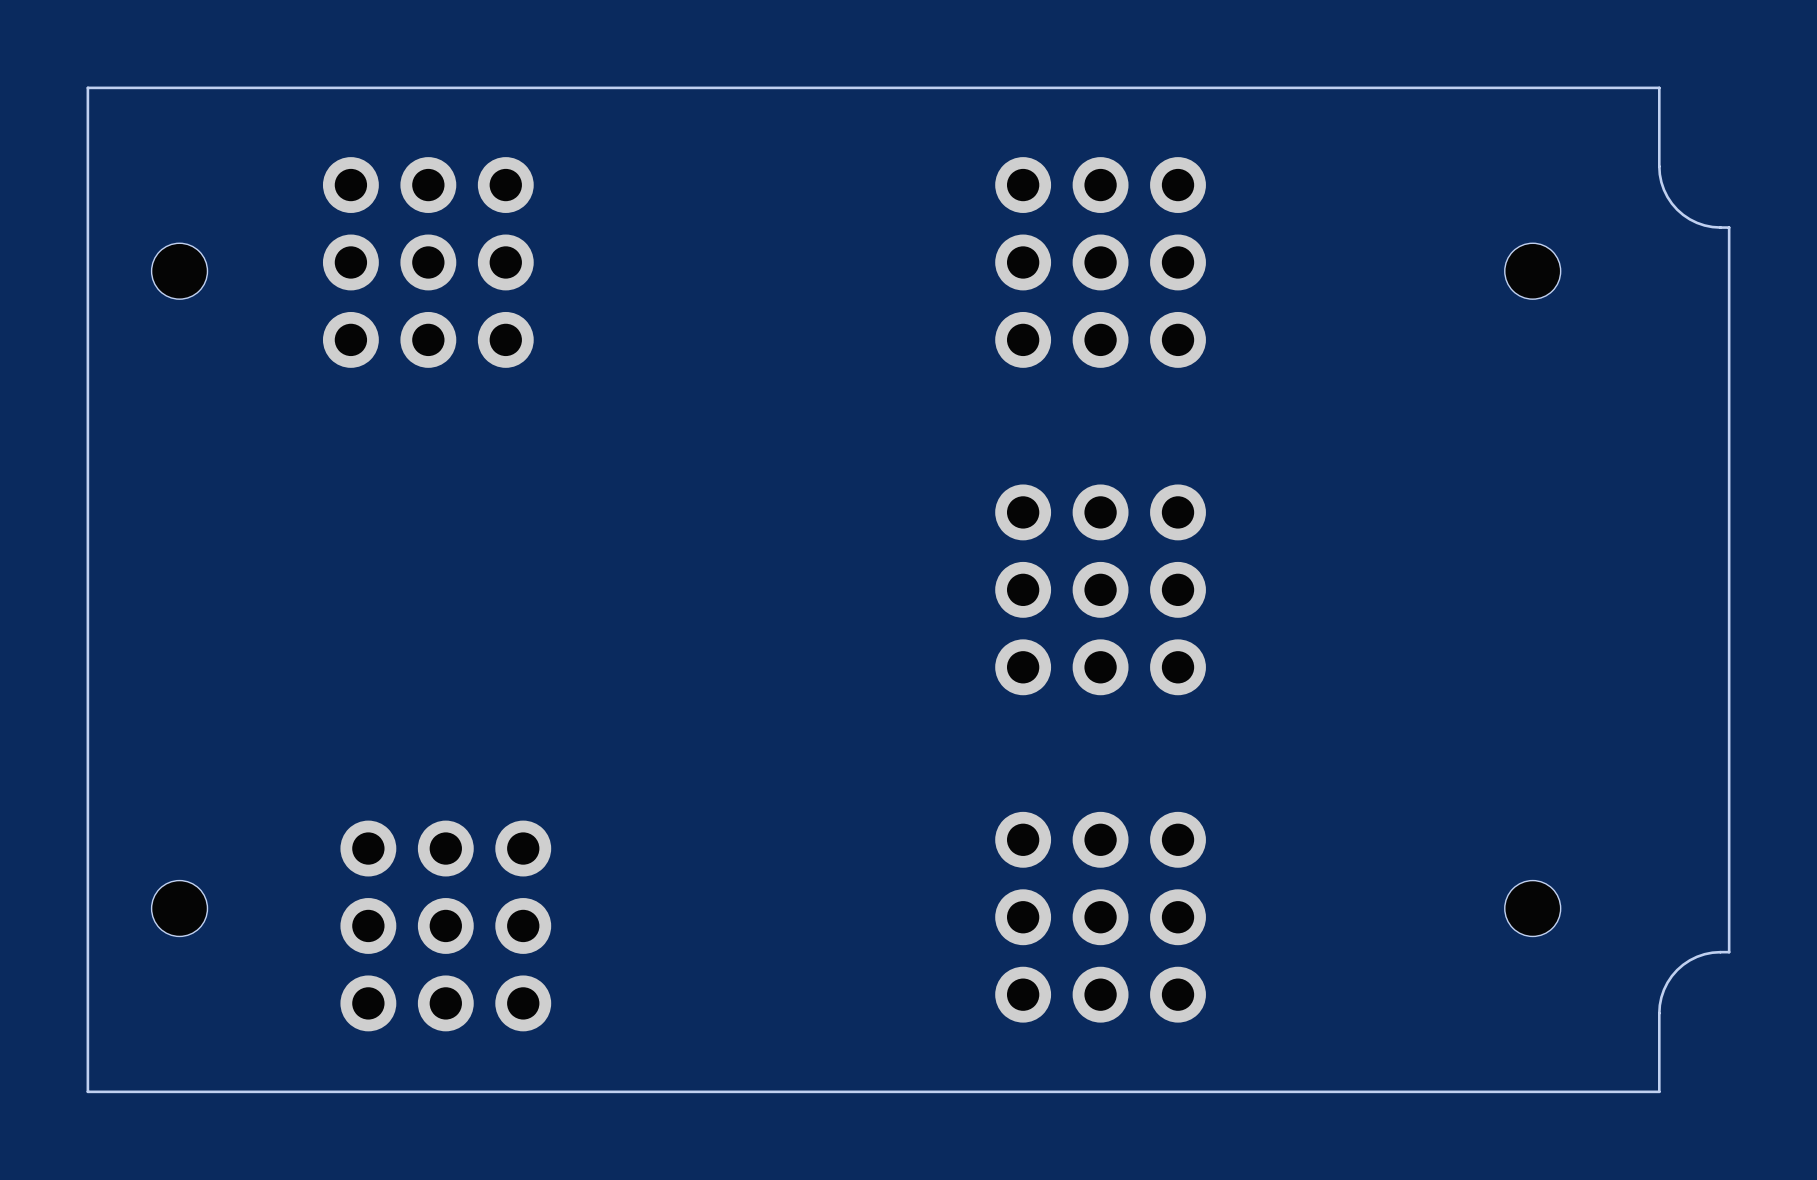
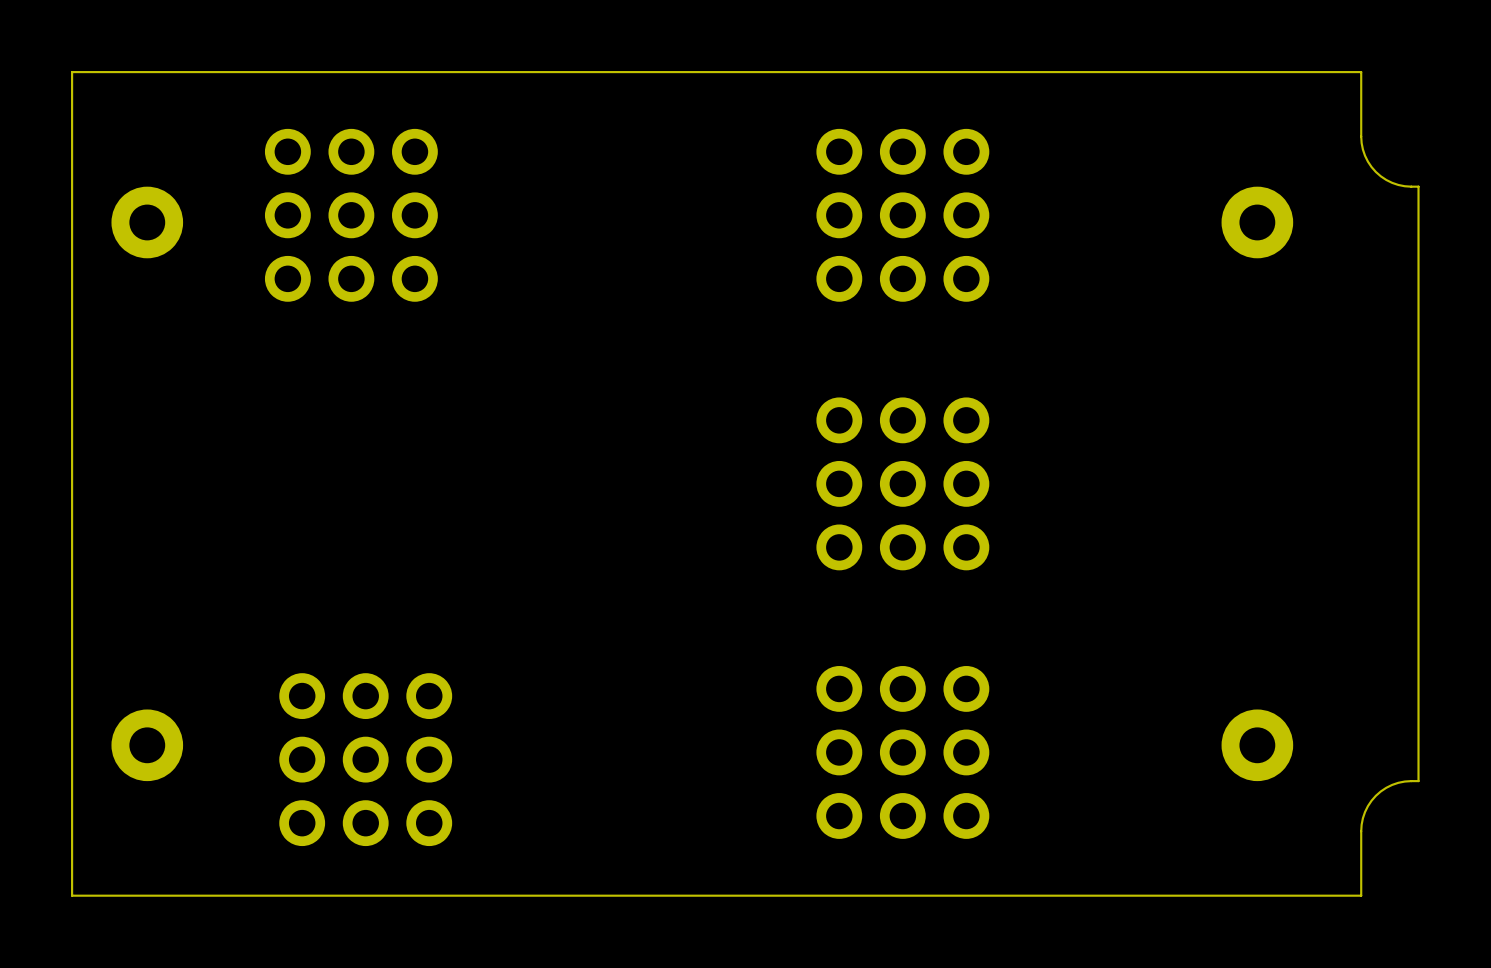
part footprint: [151, 243, 208, 300] -> [111, 186, 184, 259]
part footprint: [1504, 243, 1561, 300] -> [1221, 186, 1294, 259]
part footprint: [151, 880, 208, 937] -> [111, 709, 184, 782]
part footprint: [1504, 880, 1561, 937] -> [1221, 709, 1294, 782]

